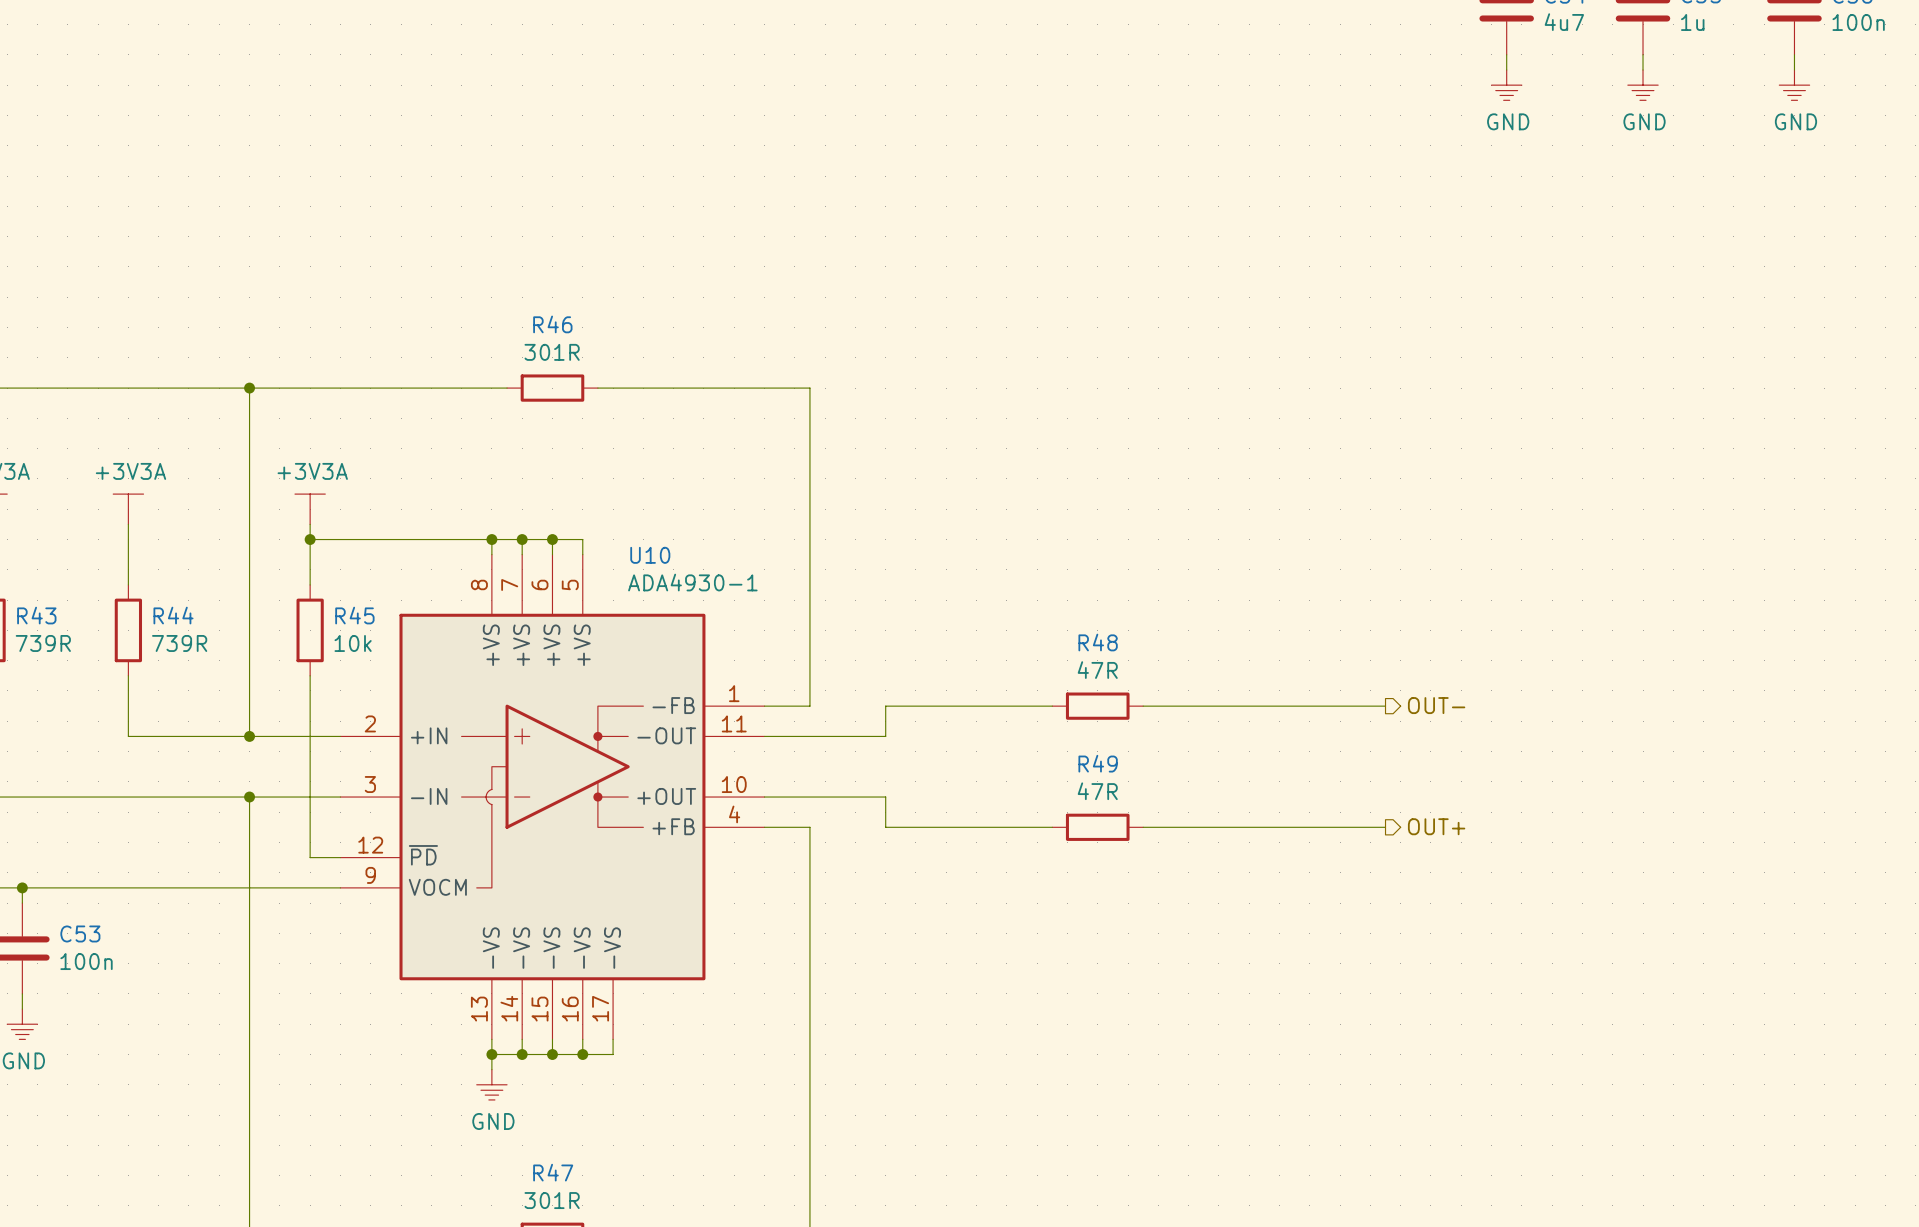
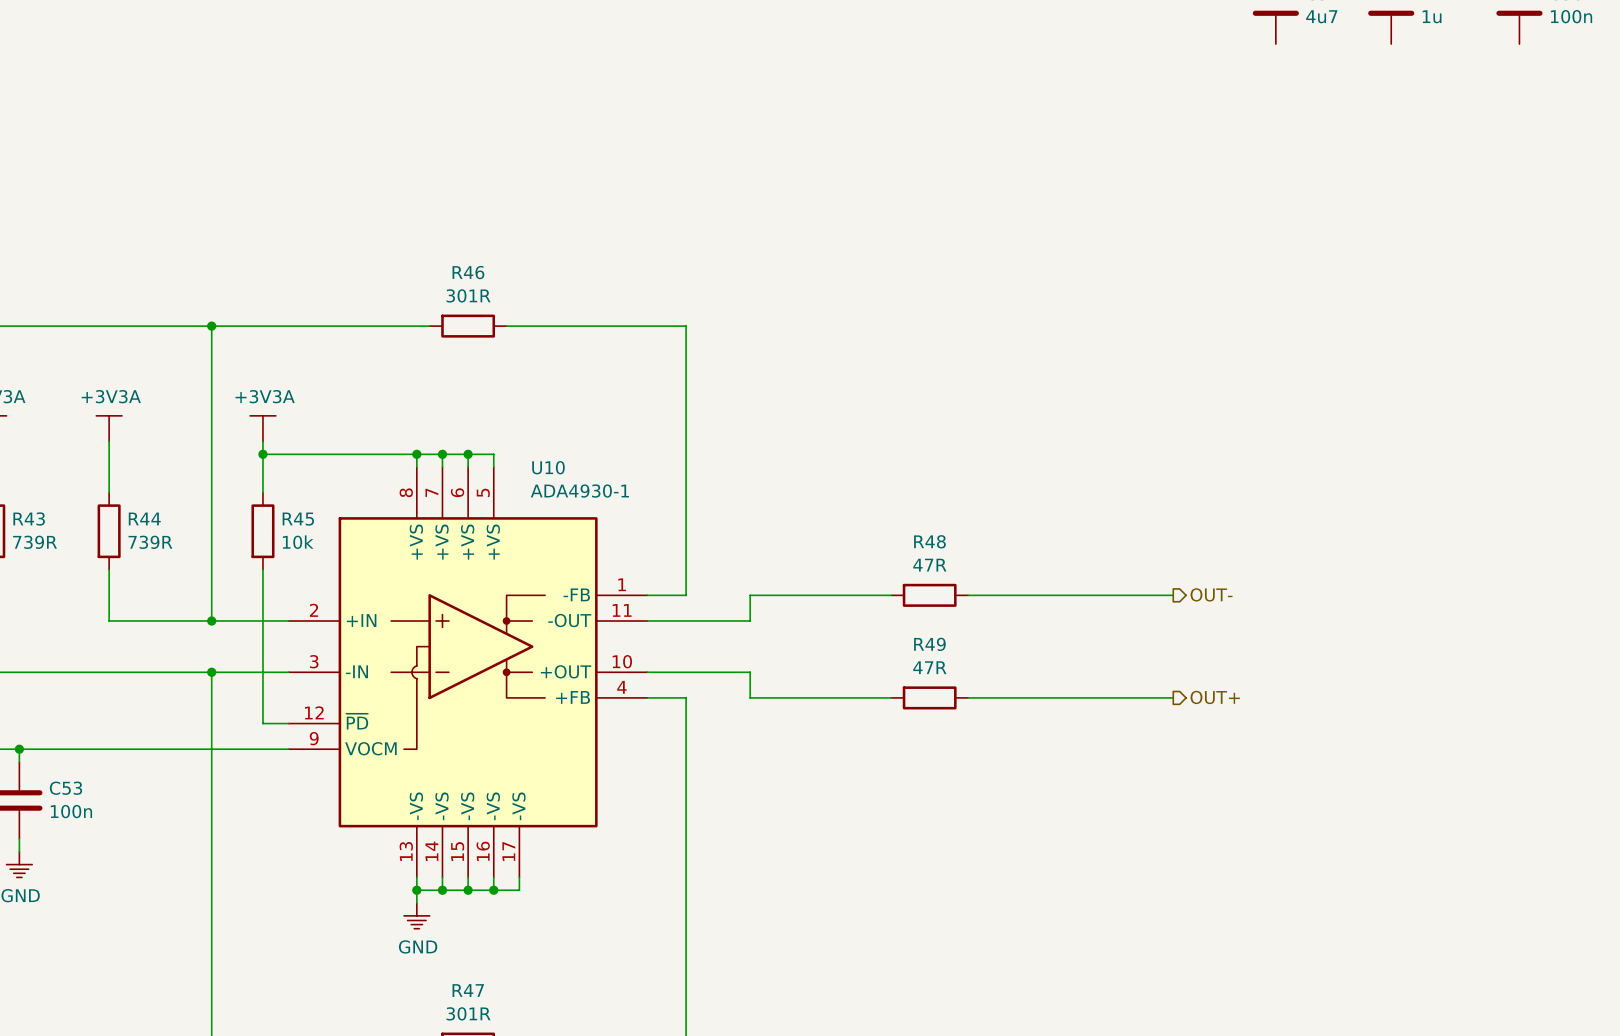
wire: (1506, 54) (1506, 70) -> none
wire: (1643, 54) (1643, 70) -> none
wire: (1794, 54) (1794, 70) -> none
power symbol: GND (1506, 85) -> none
power symbol: GND (1643, 85) -> none
power symbol: GND (1794, 85) -> none

